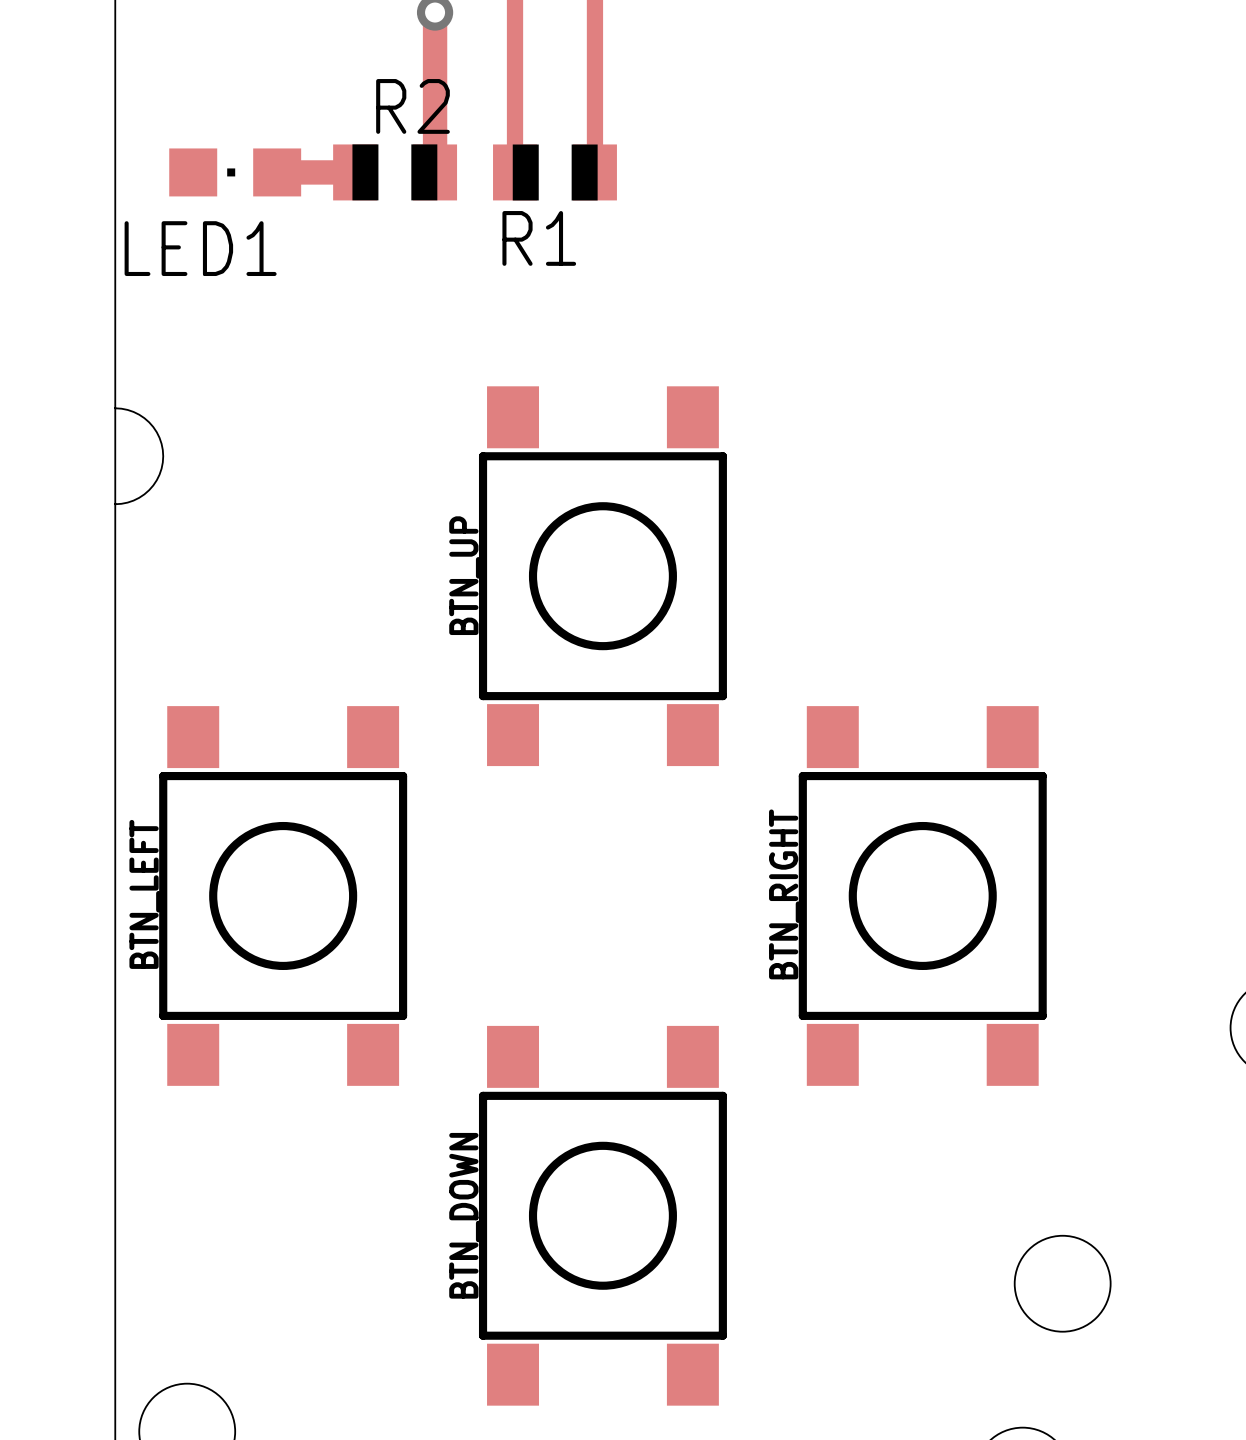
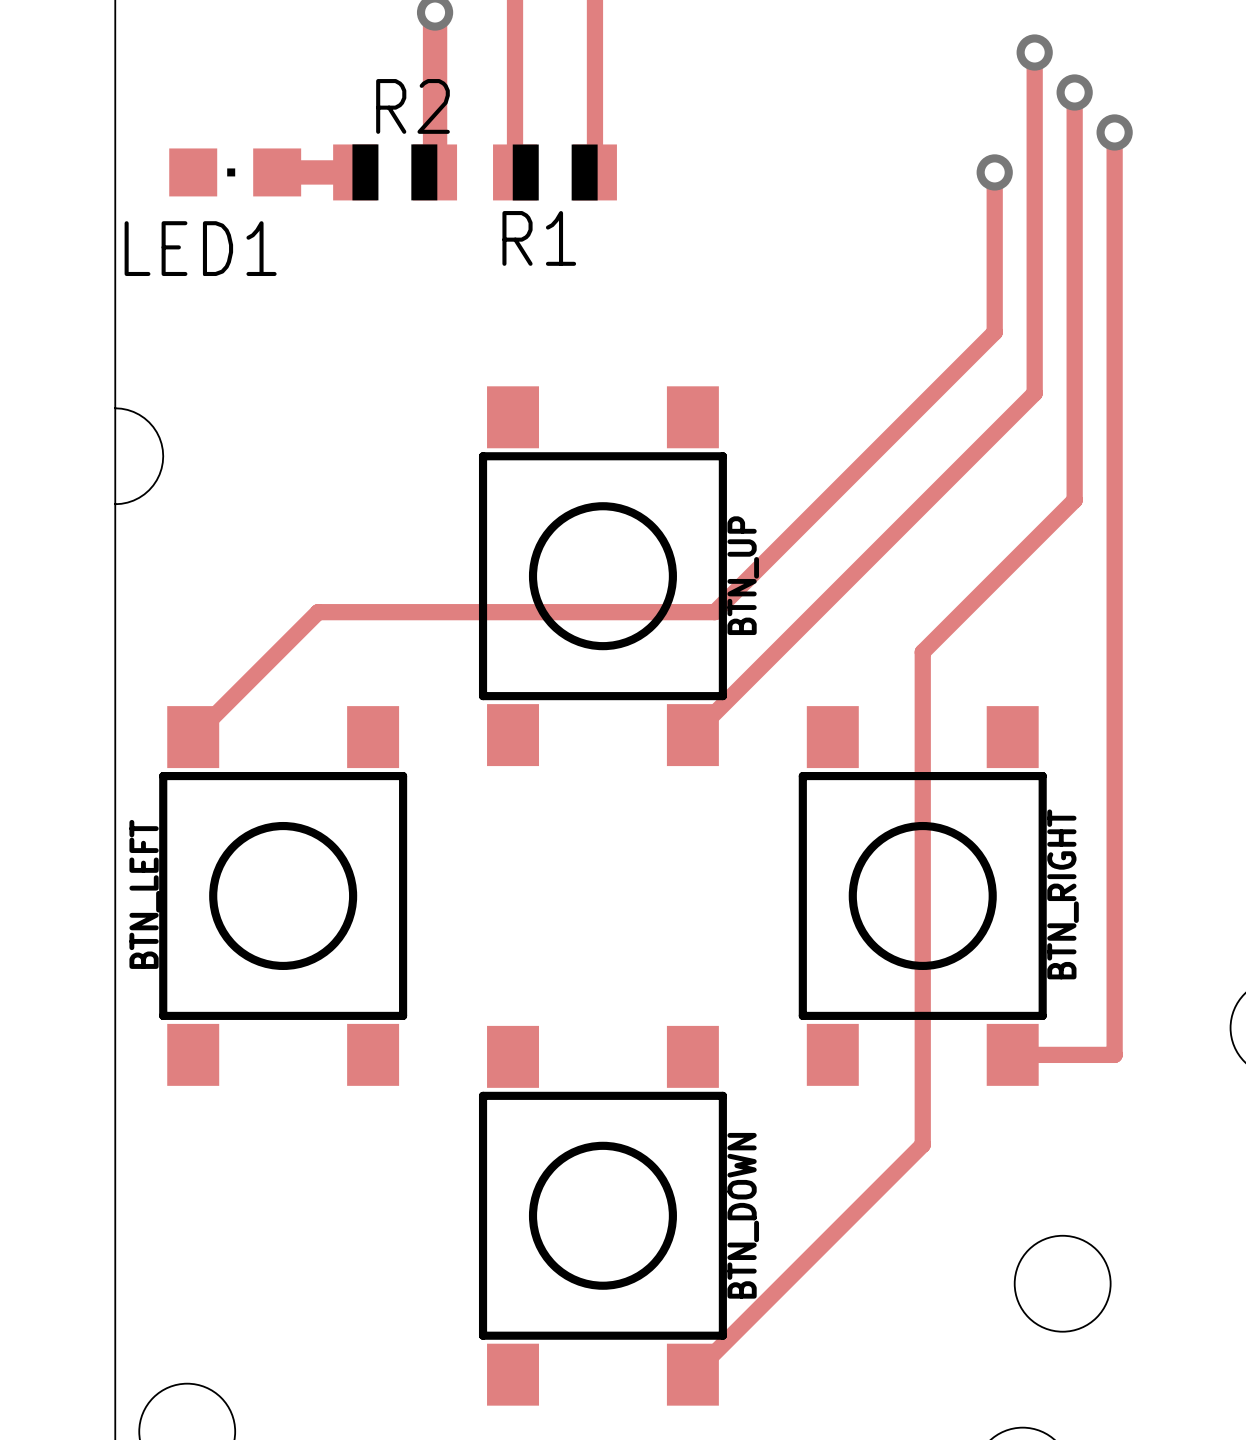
track: none -> (1034, 52) (1034, 393) (692, 735)
via: none -> (1034, 52)
track: none -> (1074, 92) (1074, 500) (922, 652) (922, 1144) (692, 1374)
via: none -> (1074, 92)
track: none -> (1114, 132) (1114, 1054) (1012, 1054)
via: none -> (1114, 132)
track: none -> (994, 172) (994, 332) (714, 612) (318, 612) (193, 737)
via: none -> (994, 172)
BTN_UP name position: BTN_UP (465, 575) -> BTN_UP (743, 575)
BTN_RIGHT name position: BTN_RIGHT (784, 894) -> BTN_RIGHT (1063, 894)
BTN_DOWN name position: BTN_DOWN (465, 1215) -> BTN_DOWN (743, 1215)

